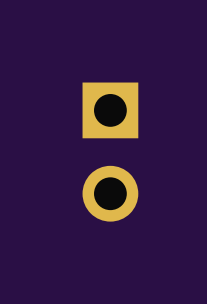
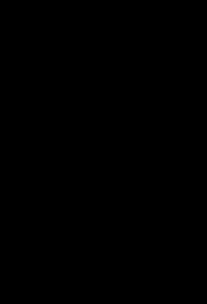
part: (110, 152) -> none

